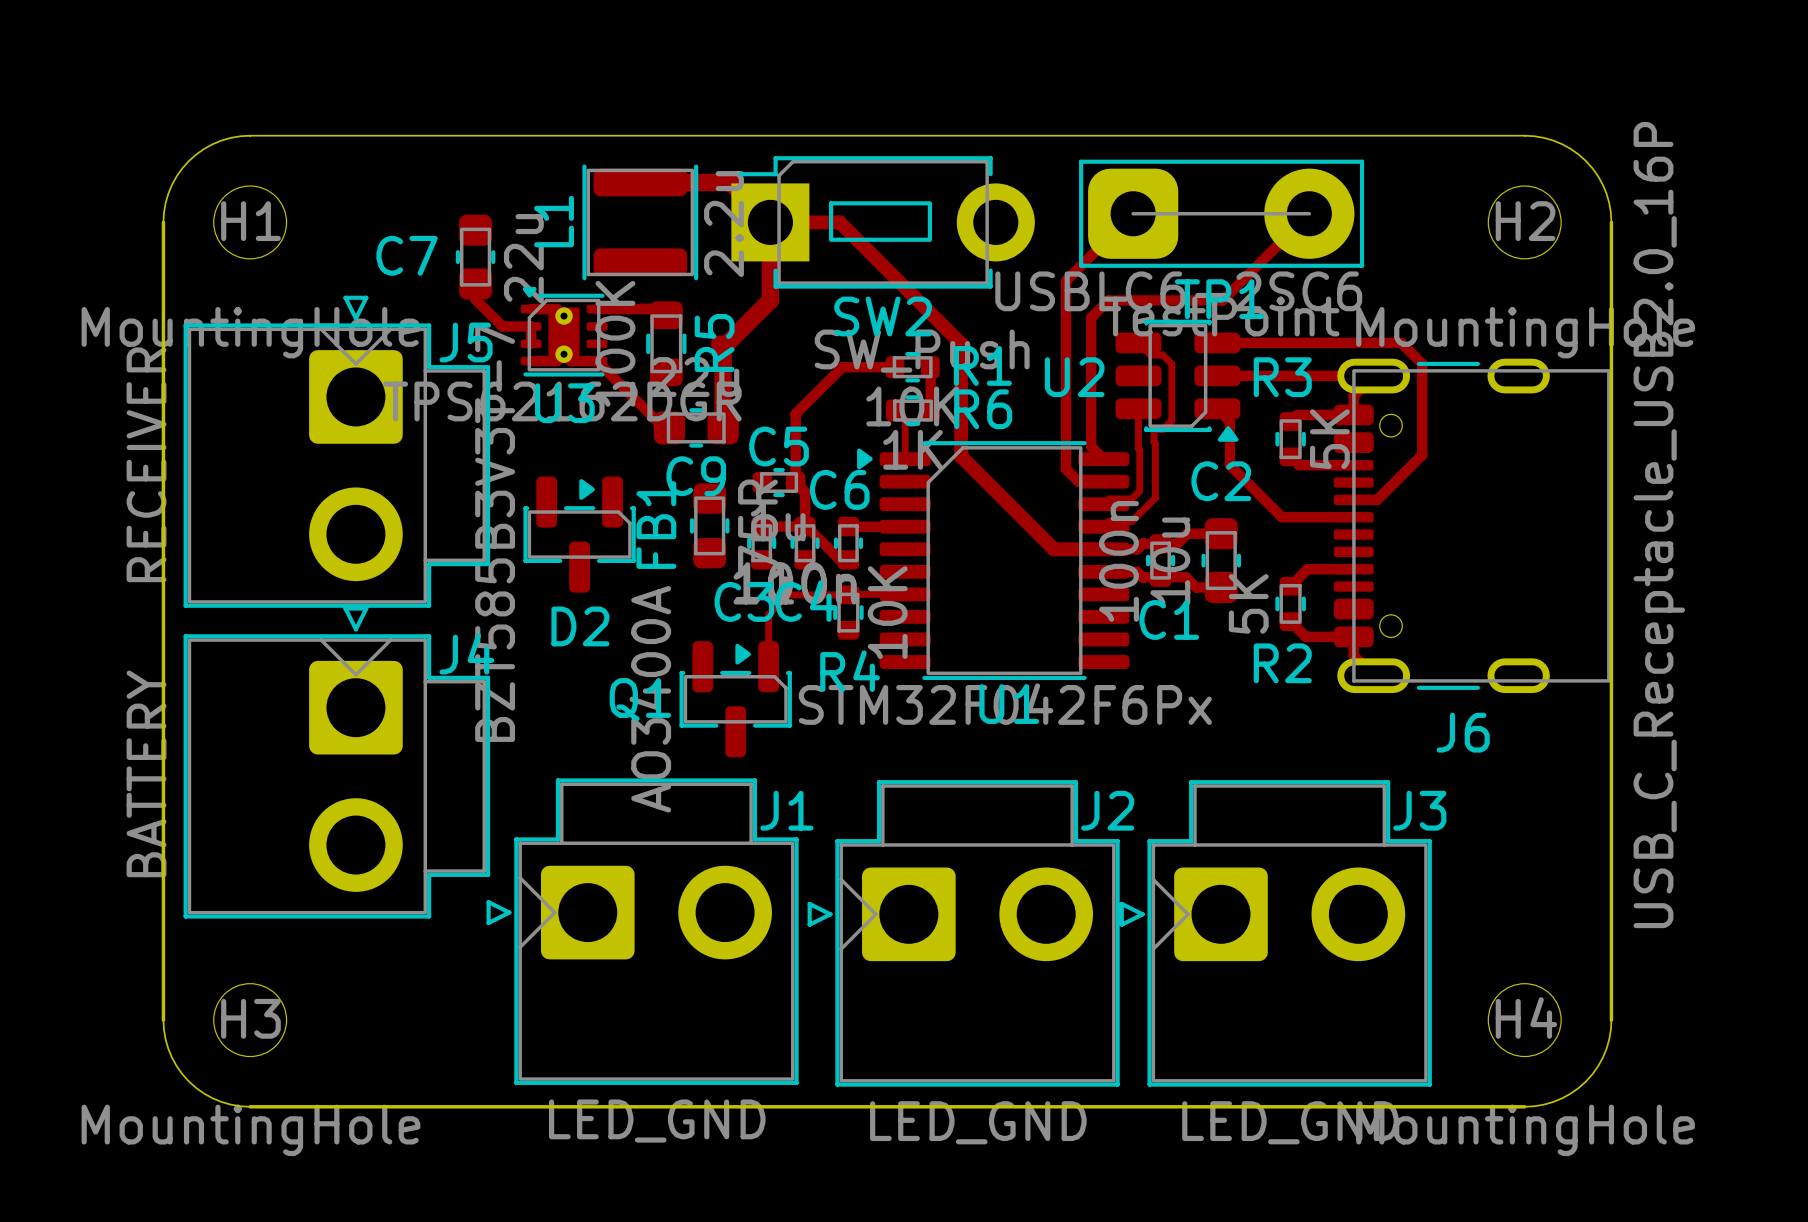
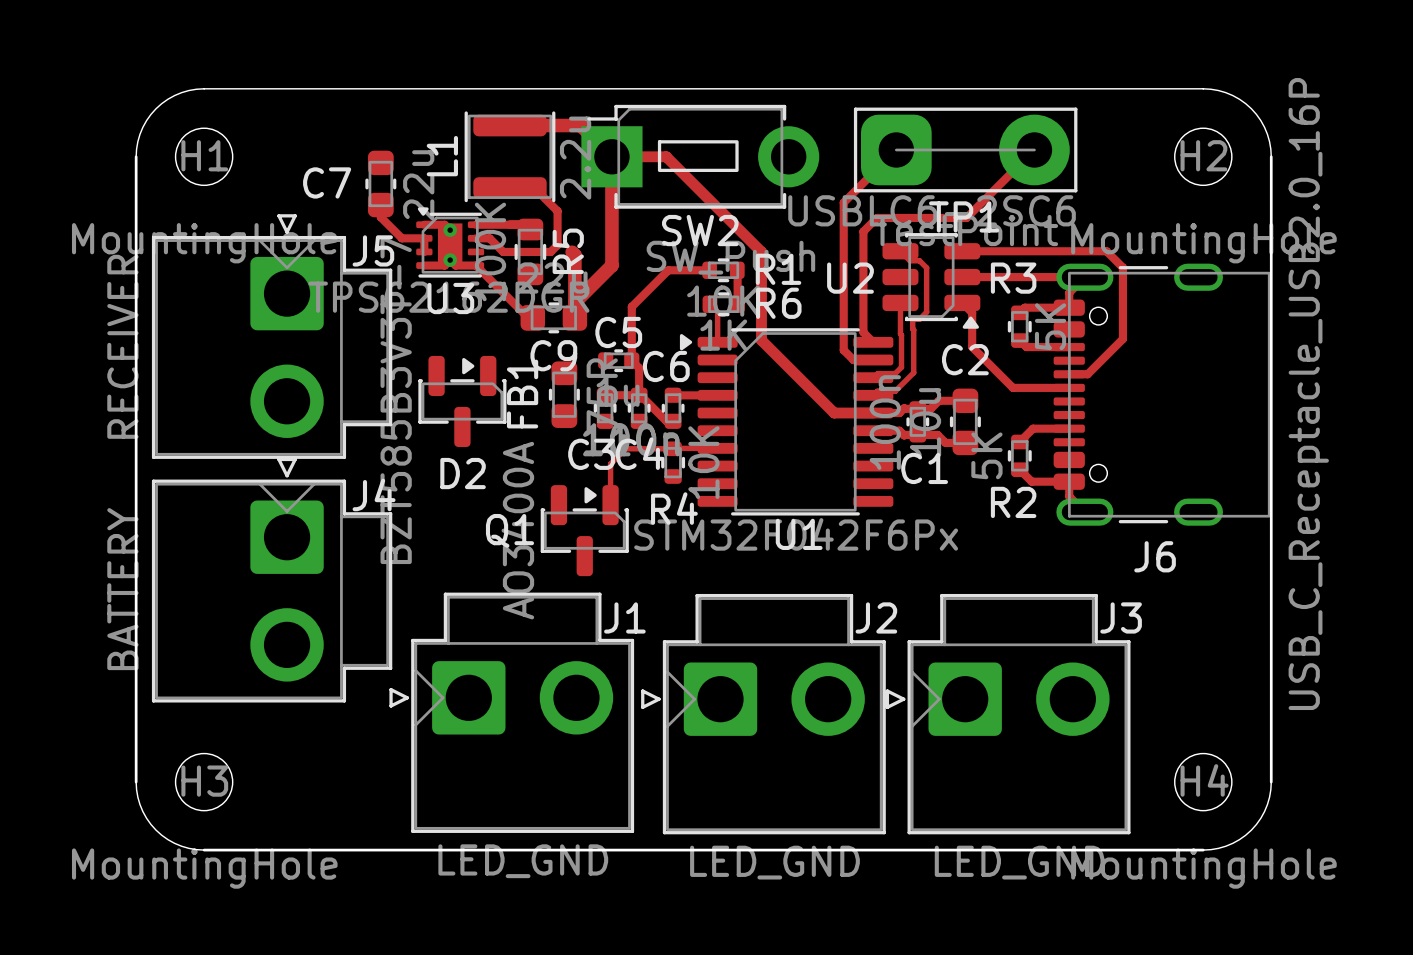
track: none -> (509, 188) (534, 188) (557, 211) (557, 245) (550, 251) (503, 251) (489, 238) (476, 238)
track: (770, 300) (723, 347) -> (611, 217) (611, 265) (574, 302)

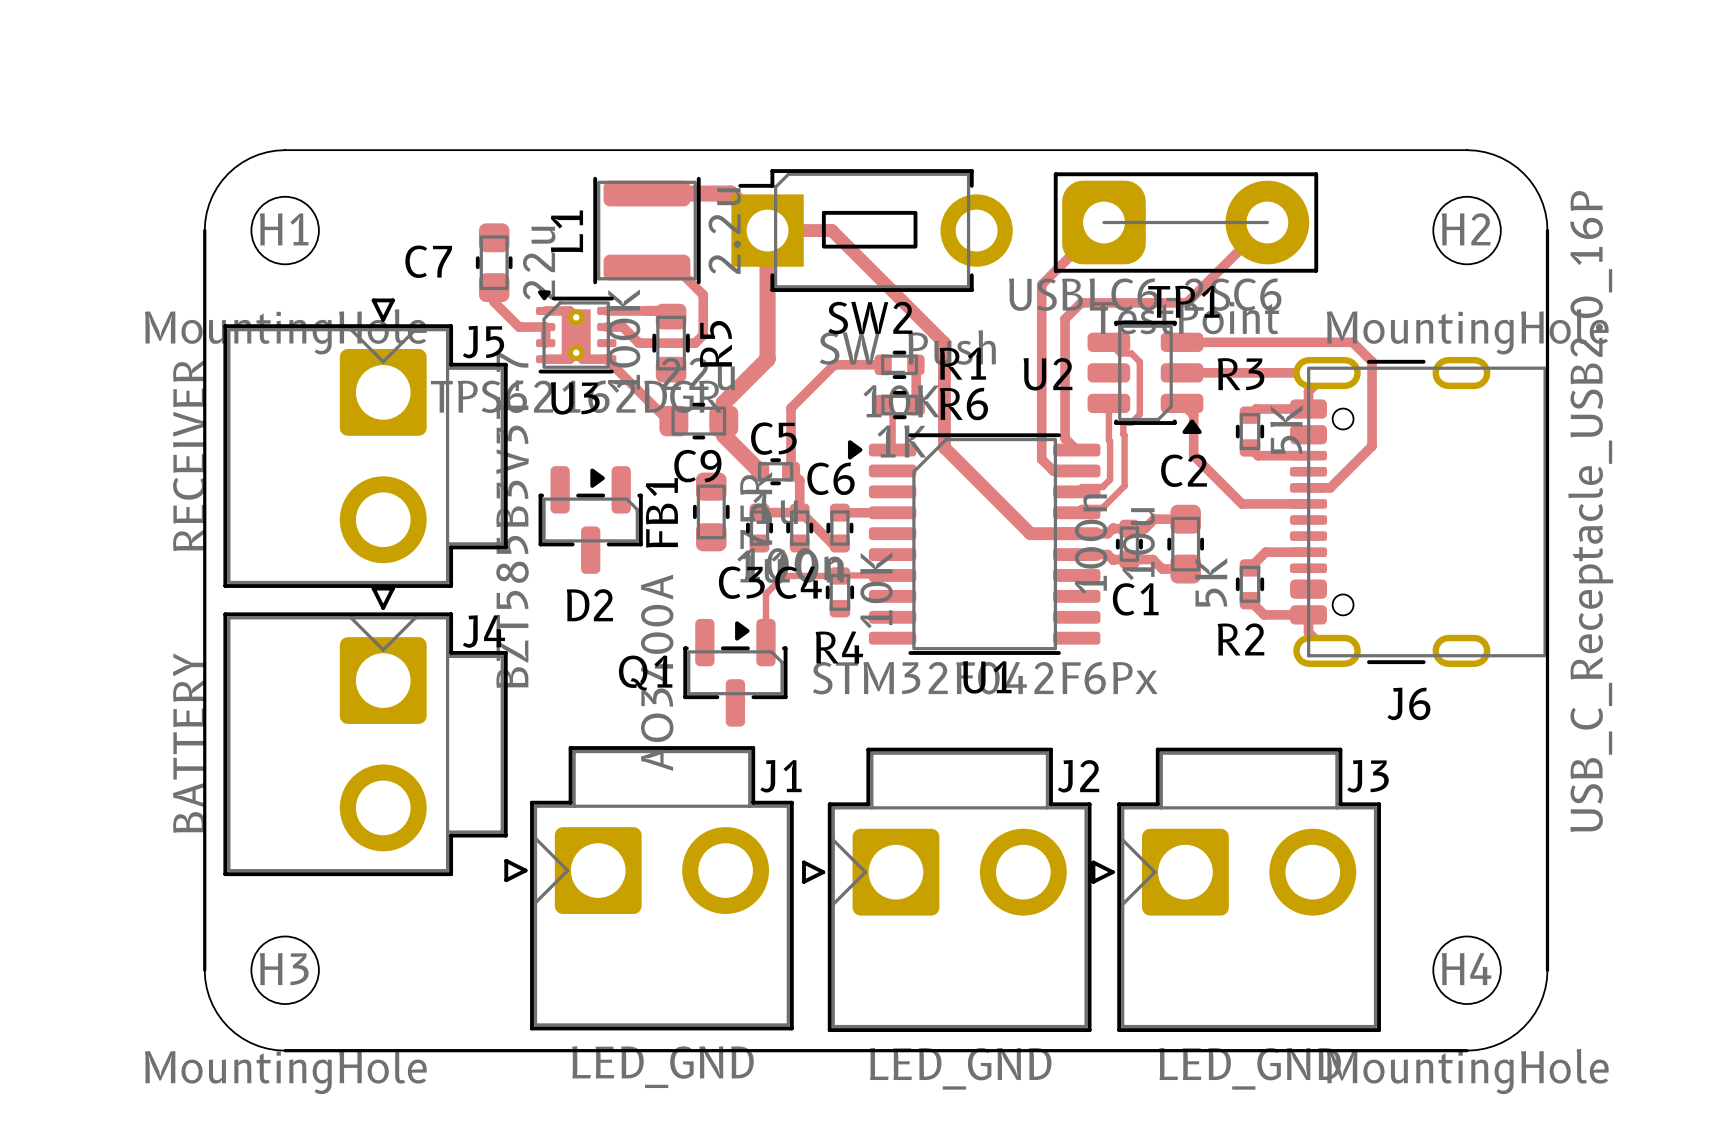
track: (572, 252) (574, 255) (574, 302) -> none
track: none -> (723, 435) (760, 471)

